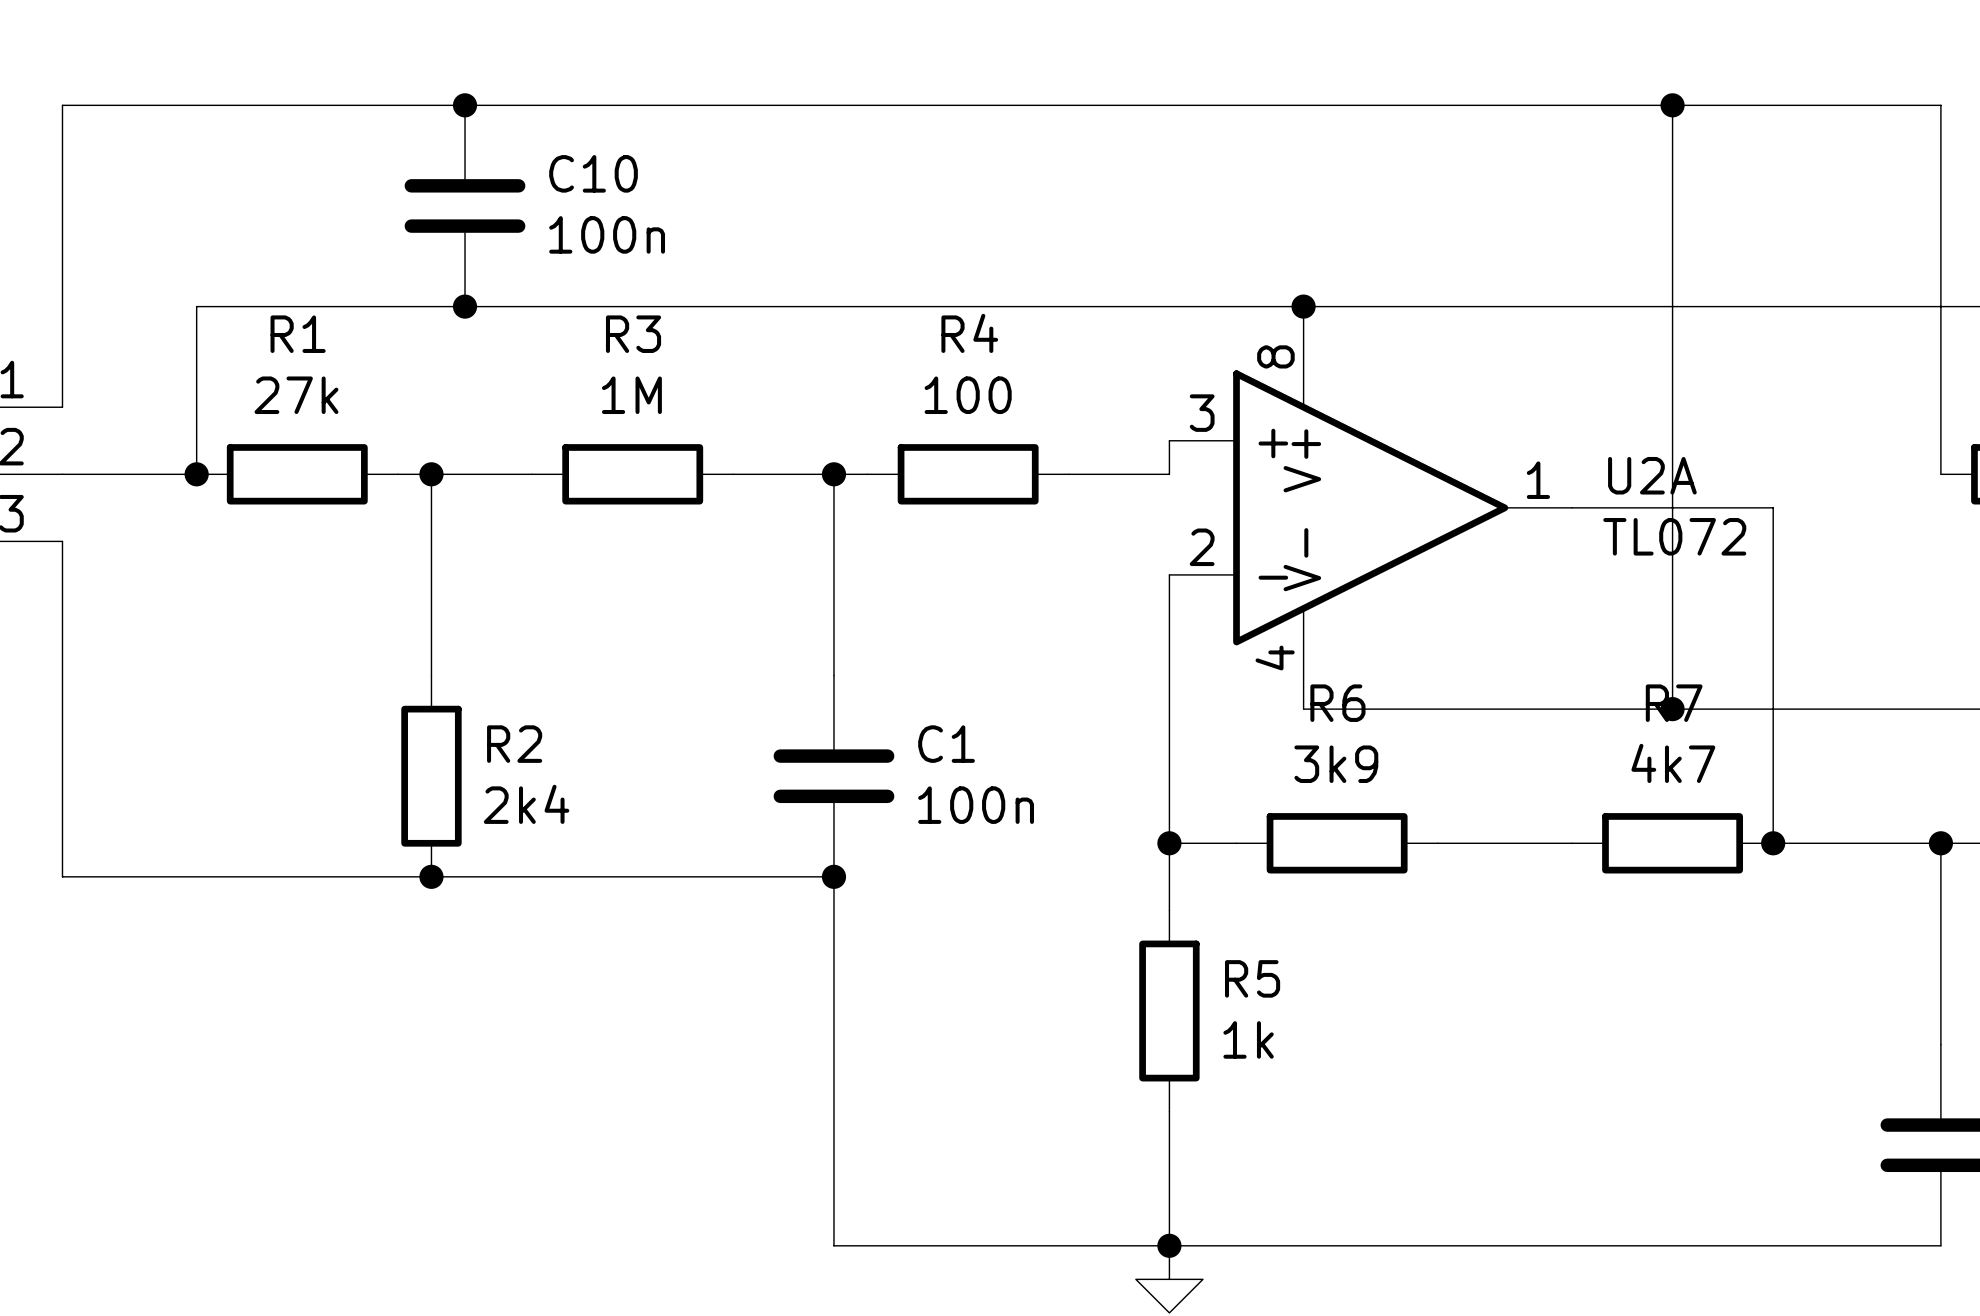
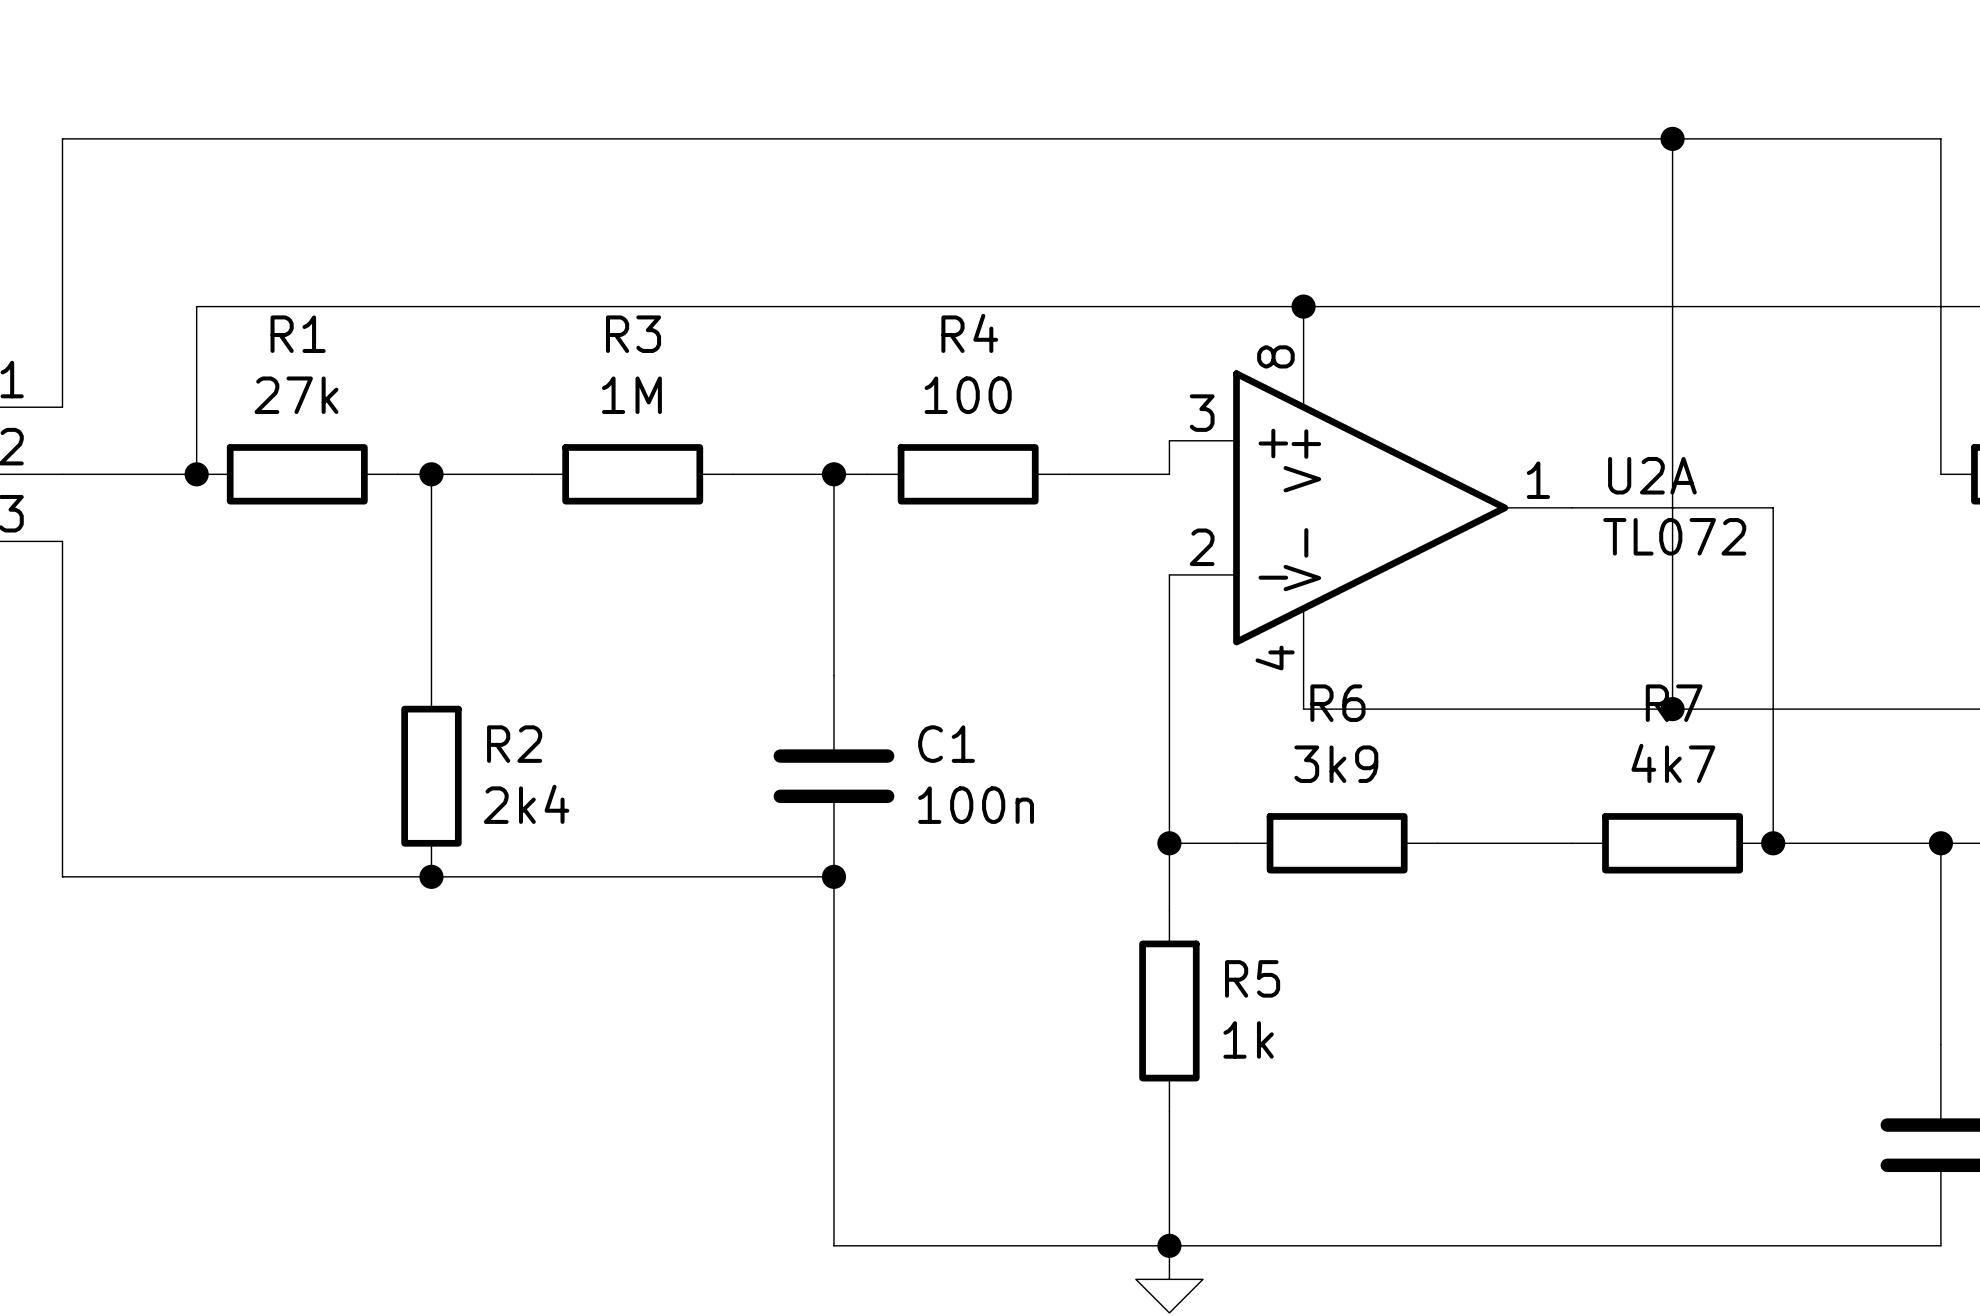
junction: (465, 105) -> none
wire: (1672, 105) (1672, 138) -> none
junction position: (1672, 105) -> (1672, 138)
wire: (62, 138) (62, 105) (1940, 105) (1940, 138) -> (62, 138) (1940, 138)
C10: 100n (465, 205) -> none
junction: (465, 306) -> none

